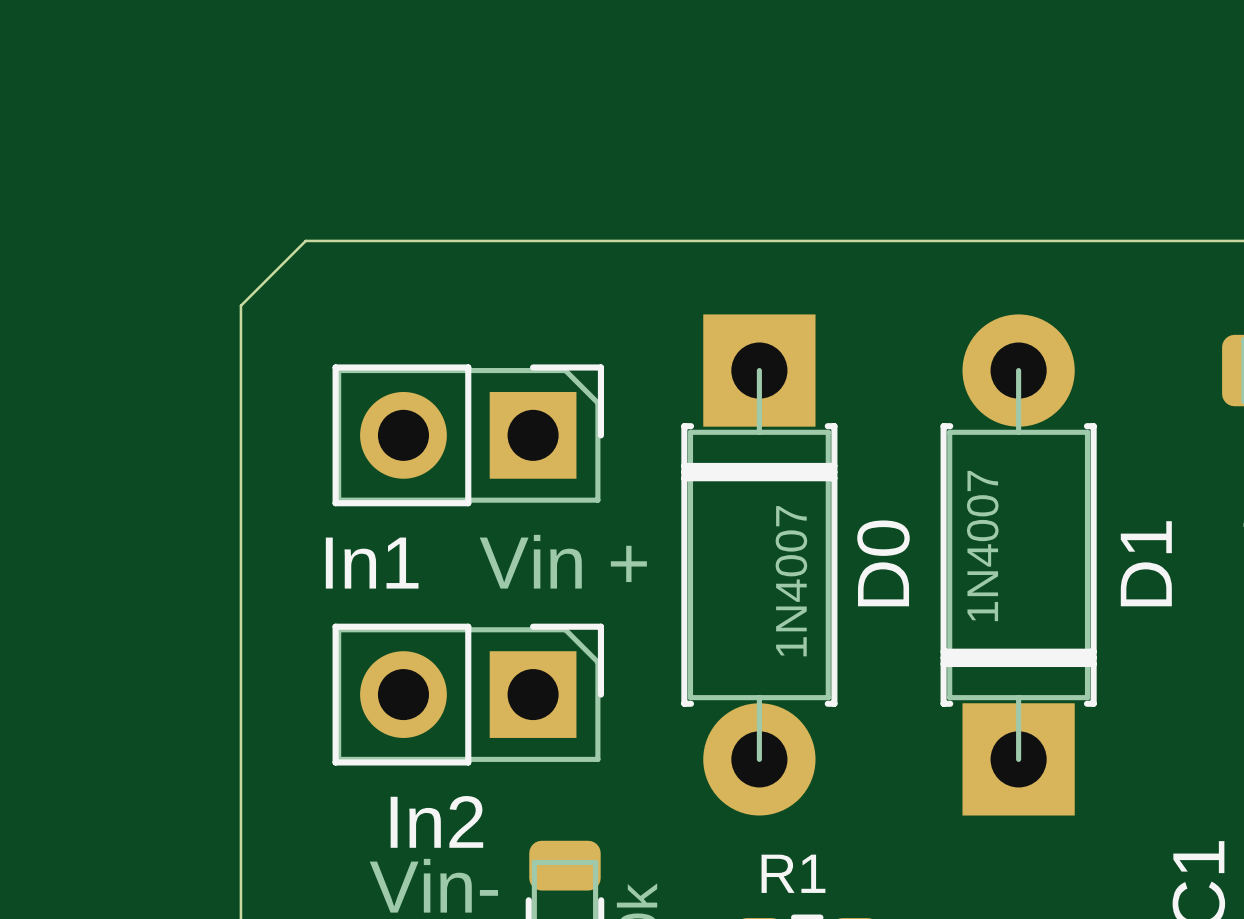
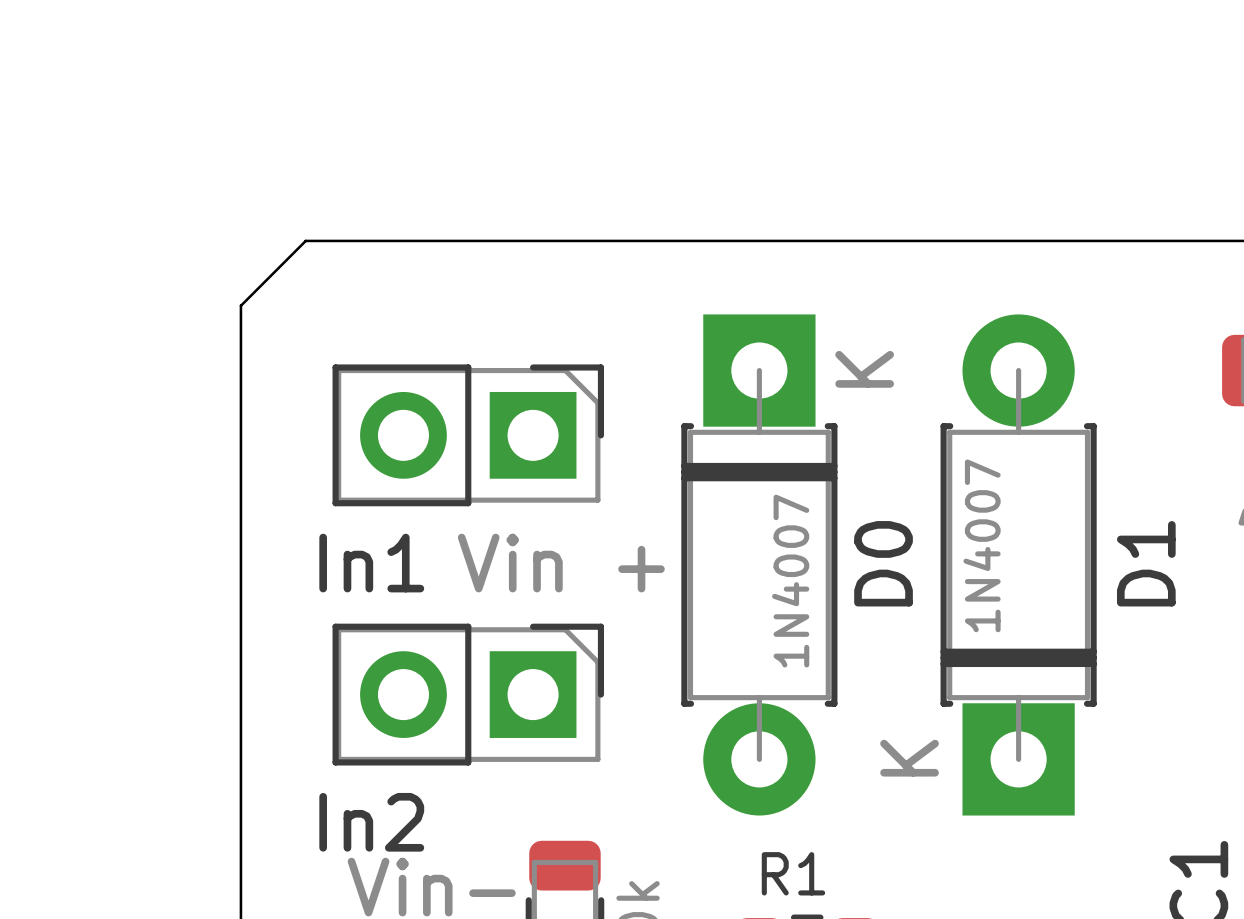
D0 text: none -> K (864, 369)
D1 text: none -> K (909, 758)
In2 name position: In2 (436, 821) -> In2 (371, 822)

